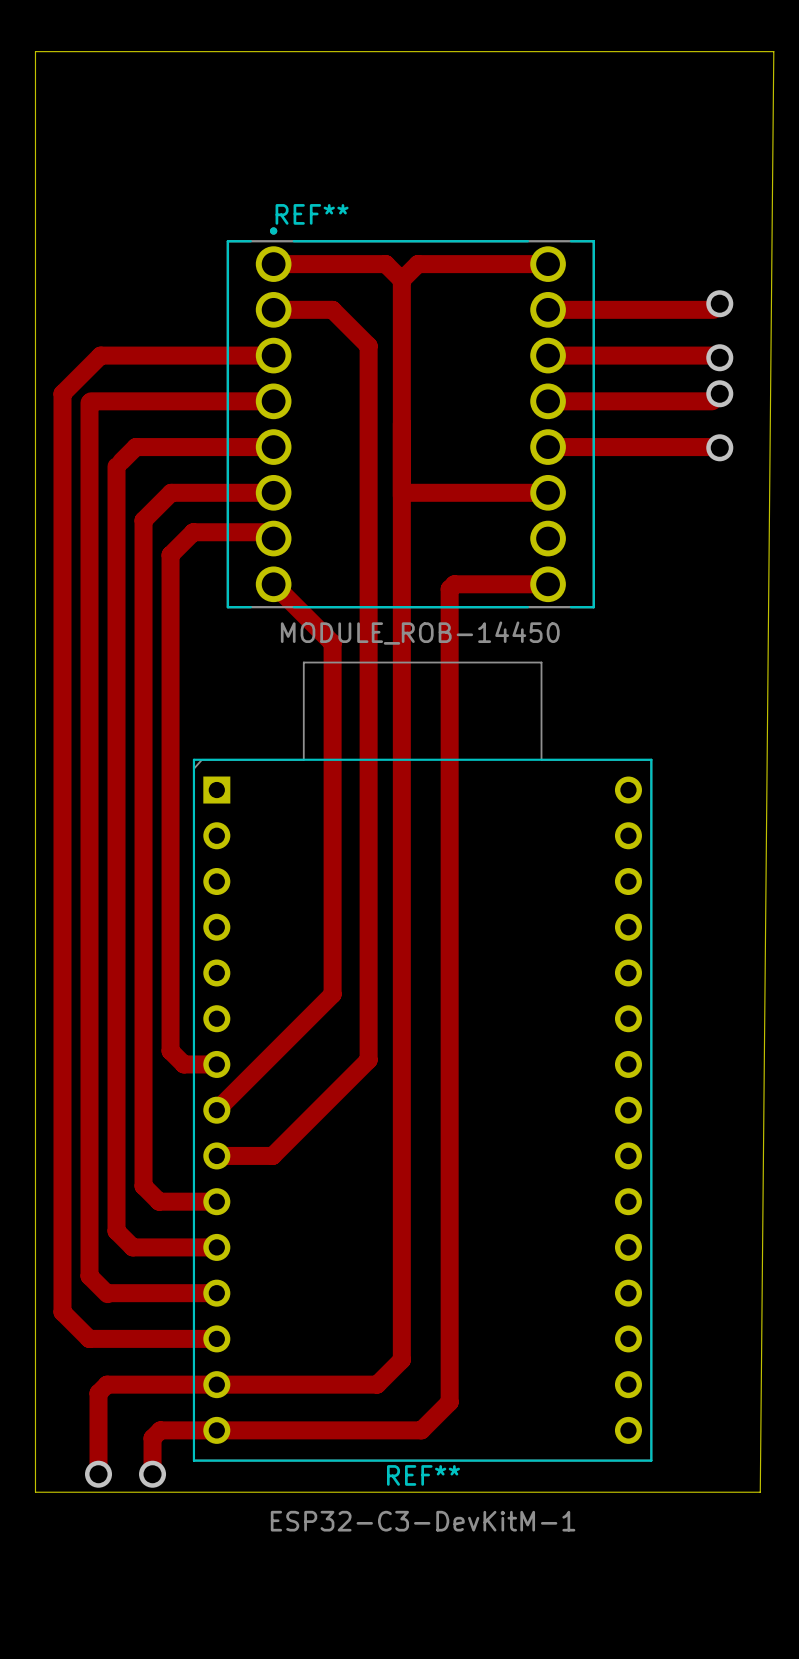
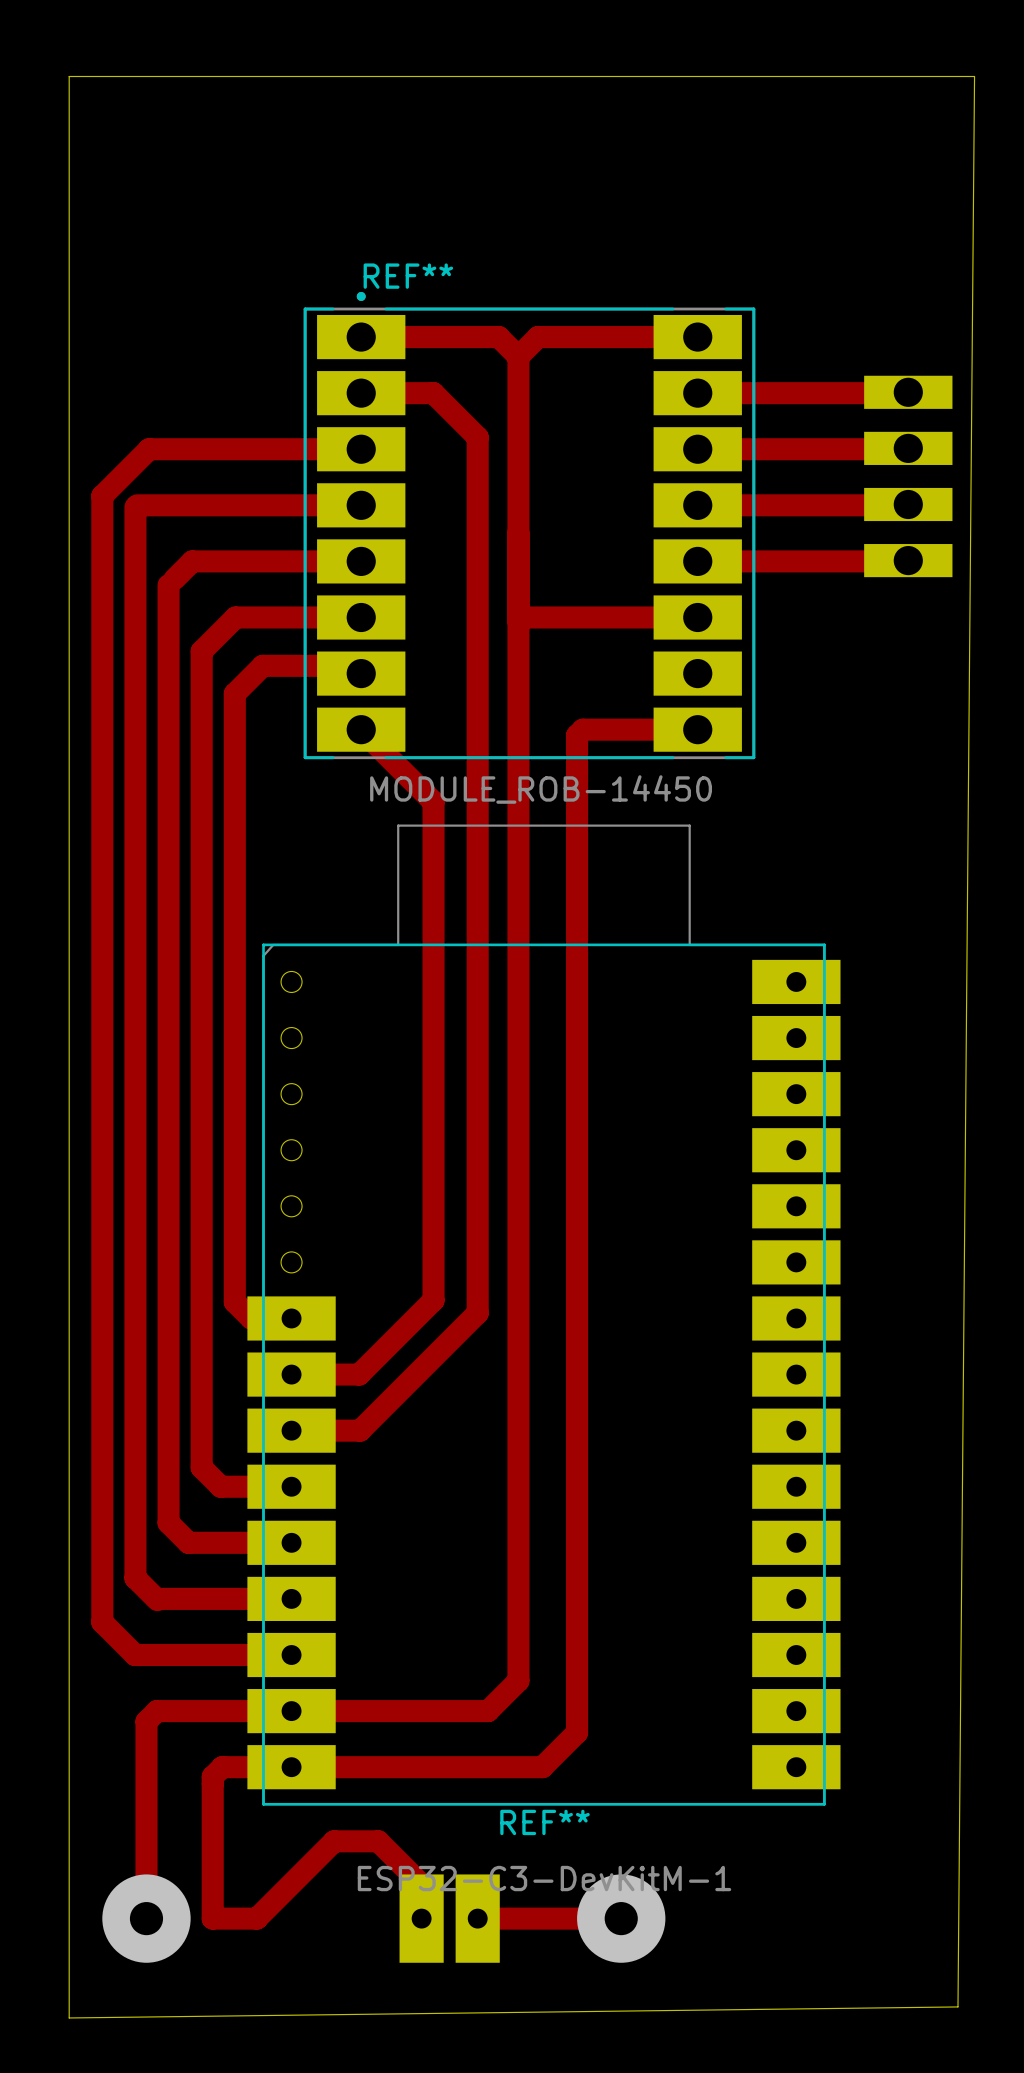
board edge: (773, 51) (760, 1492) (35, 1492) -> (974, 76) (957, 2006) (69, 2017) (69, 1843)
REF** footprint: [226, 227, 595, 609] -> [303, 292, 756, 760]
via: (719, 303) -> none
part: none -> (908, 392)
part: none -> (908, 448)
via: (719, 357) -> none
via: (719, 393) -> none
part: none -> (908, 504)
part: none -> (908, 560)
via: (719, 447) -> none
REF** footprint: [192, 661, 653, 1462] -> [247, 824, 841, 1806]
track: (332, 994) (216, 1110) -> (433, 1232) (433, 1300) (359, 1374) (291, 1374)
track: none -> (146, 1820) (146, 1918)
via: (98, 1474) -> none
track: none -> (212, 1820) (212, 1918) (256, 1918) (334, 1841) (378, 1841) (421, 1884) (421, 1918)
via: (152, 1474) -> none
via: none -> (146, 1918)
part: none -> (421, 1918)
track: none -> (477, 1918) (621, 1918)
part: none -> (477, 1918)
via: none -> (621, 1918)

